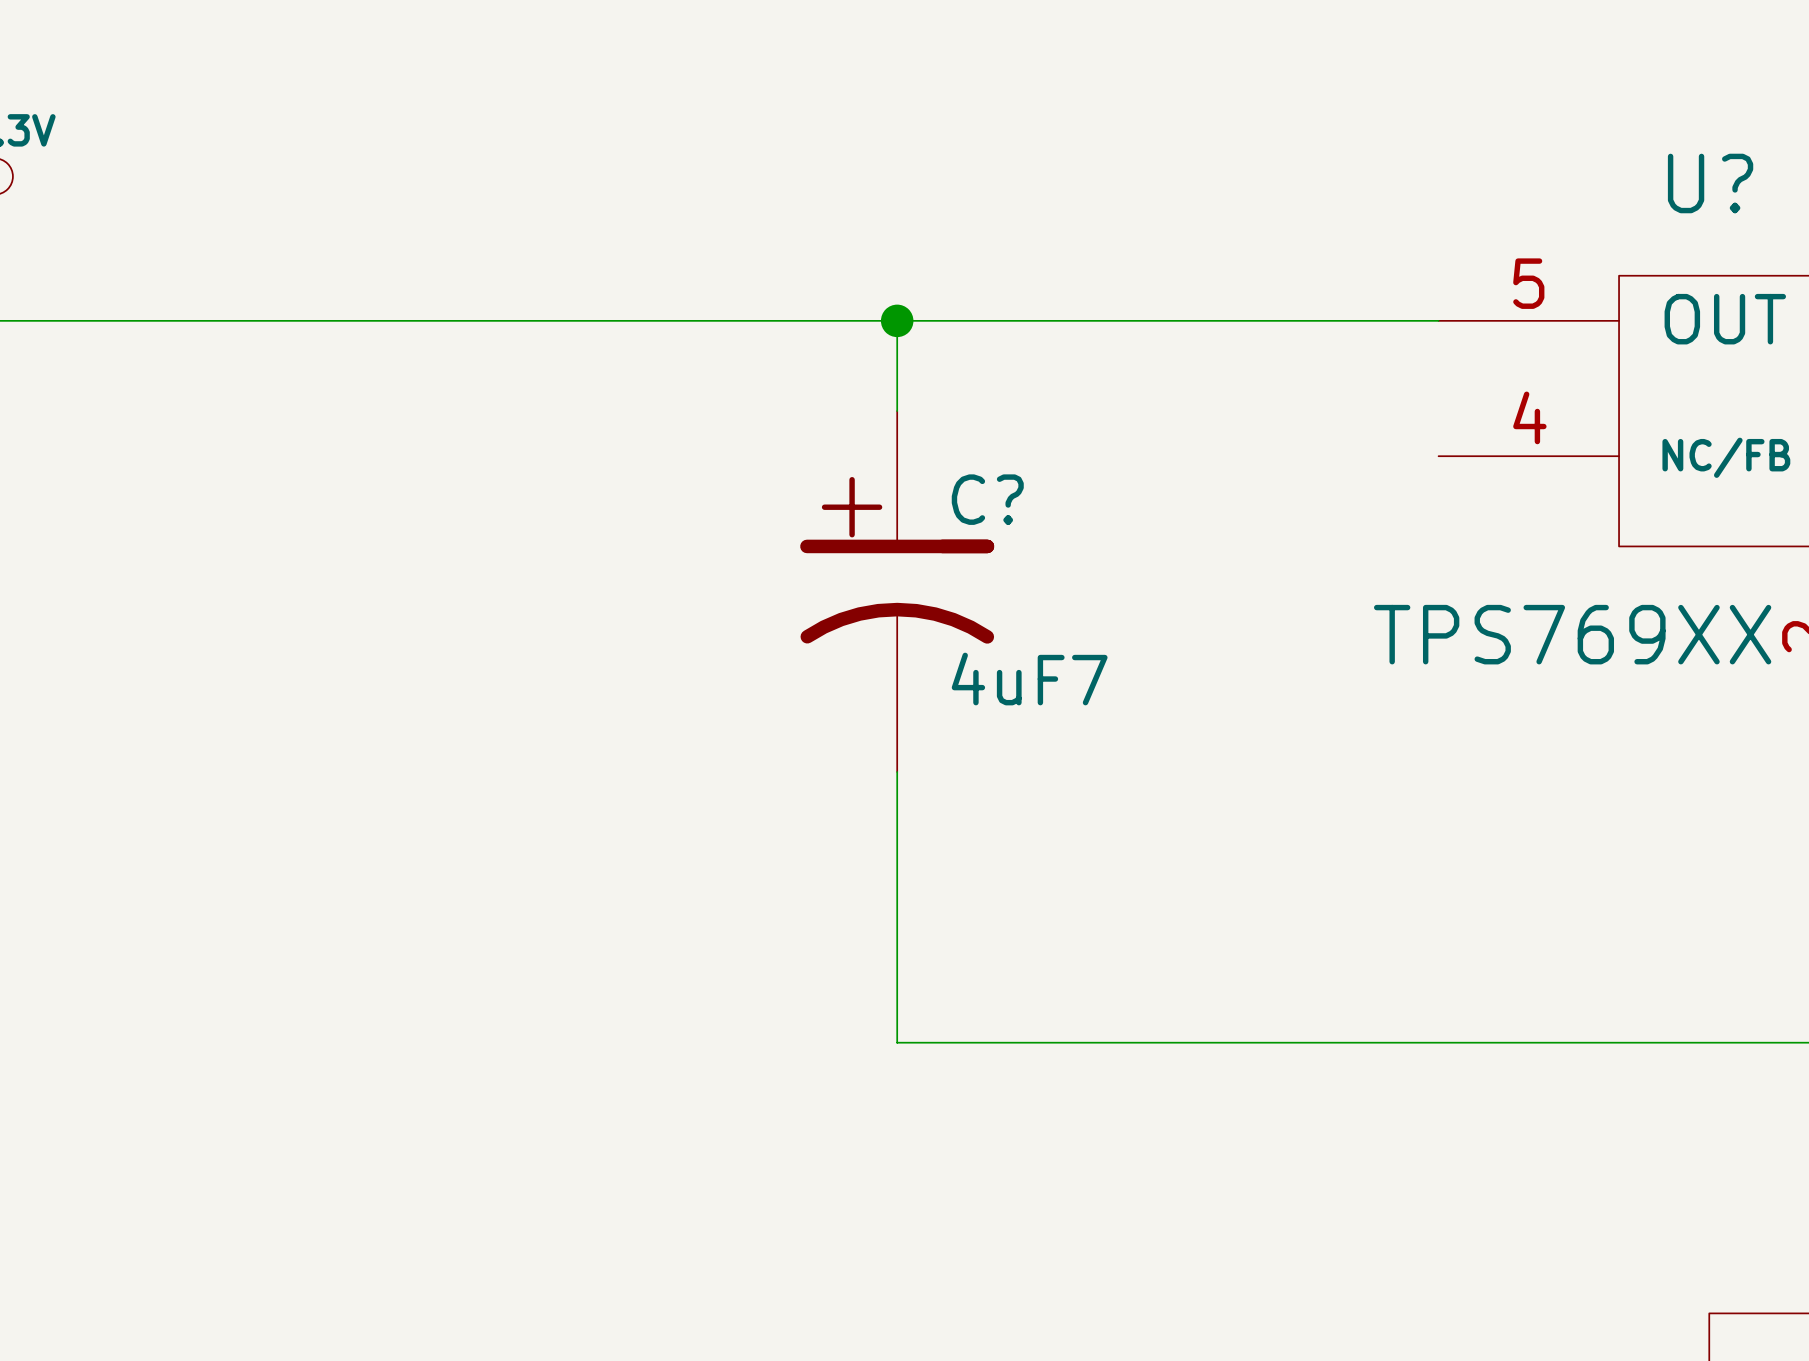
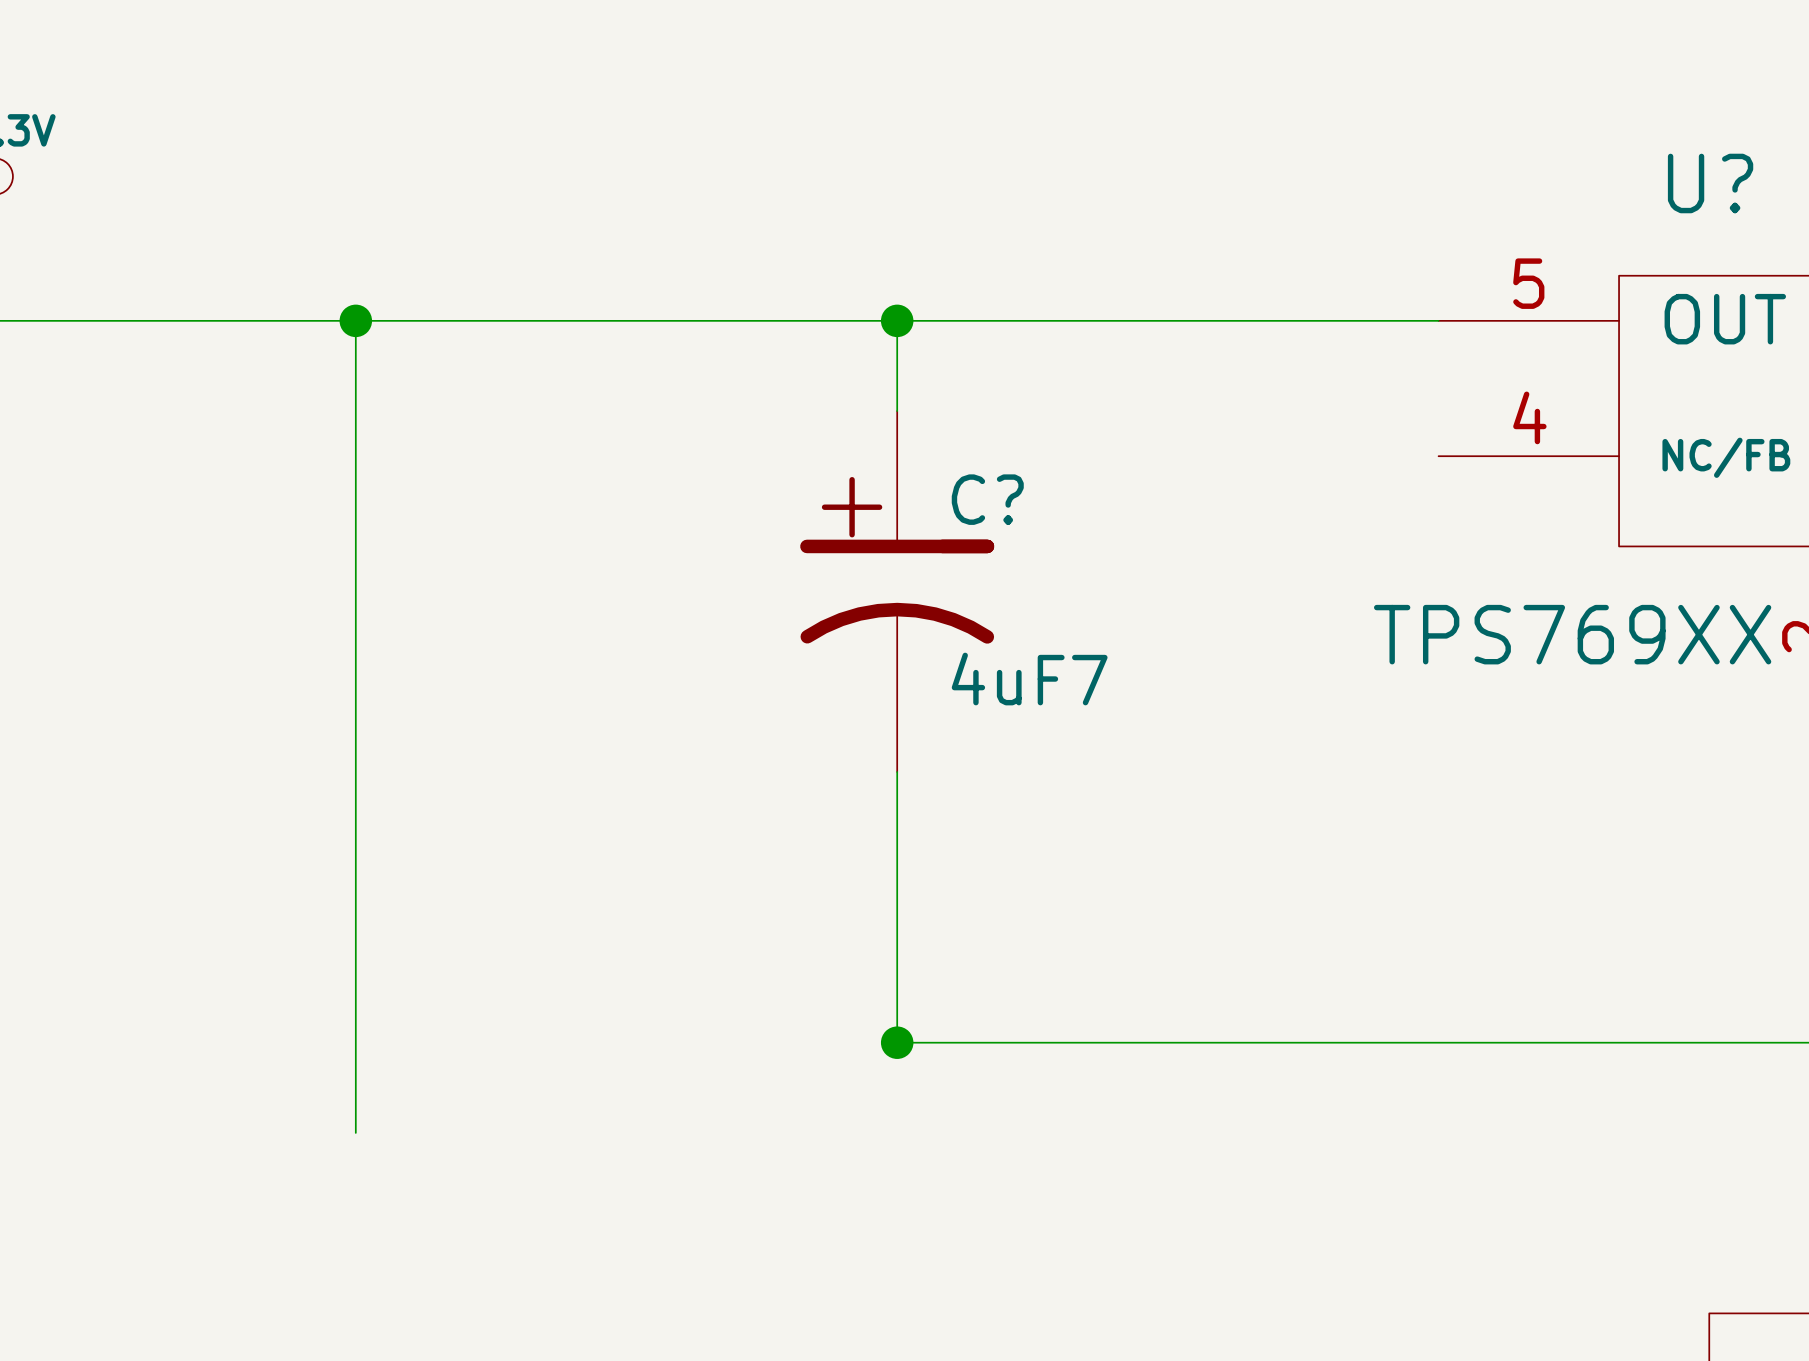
wire: none -> (355, 320) (355, 1132)
junction: none -> (355, 320)
junction: none -> (897, 1042)

